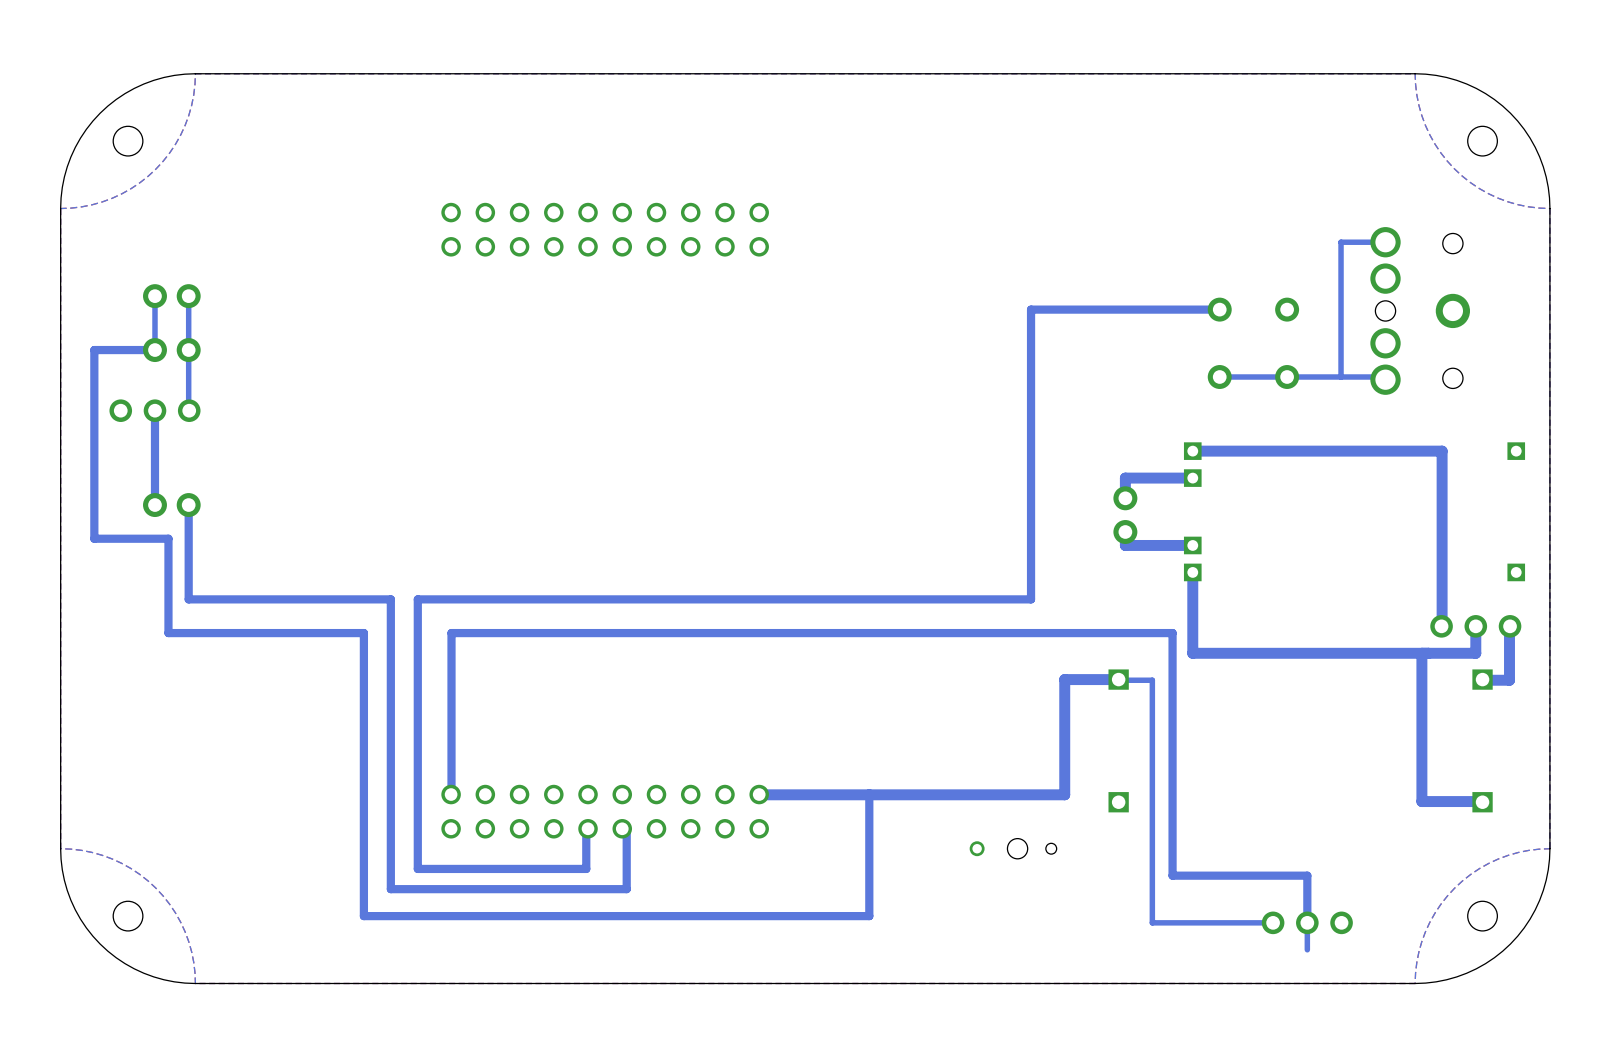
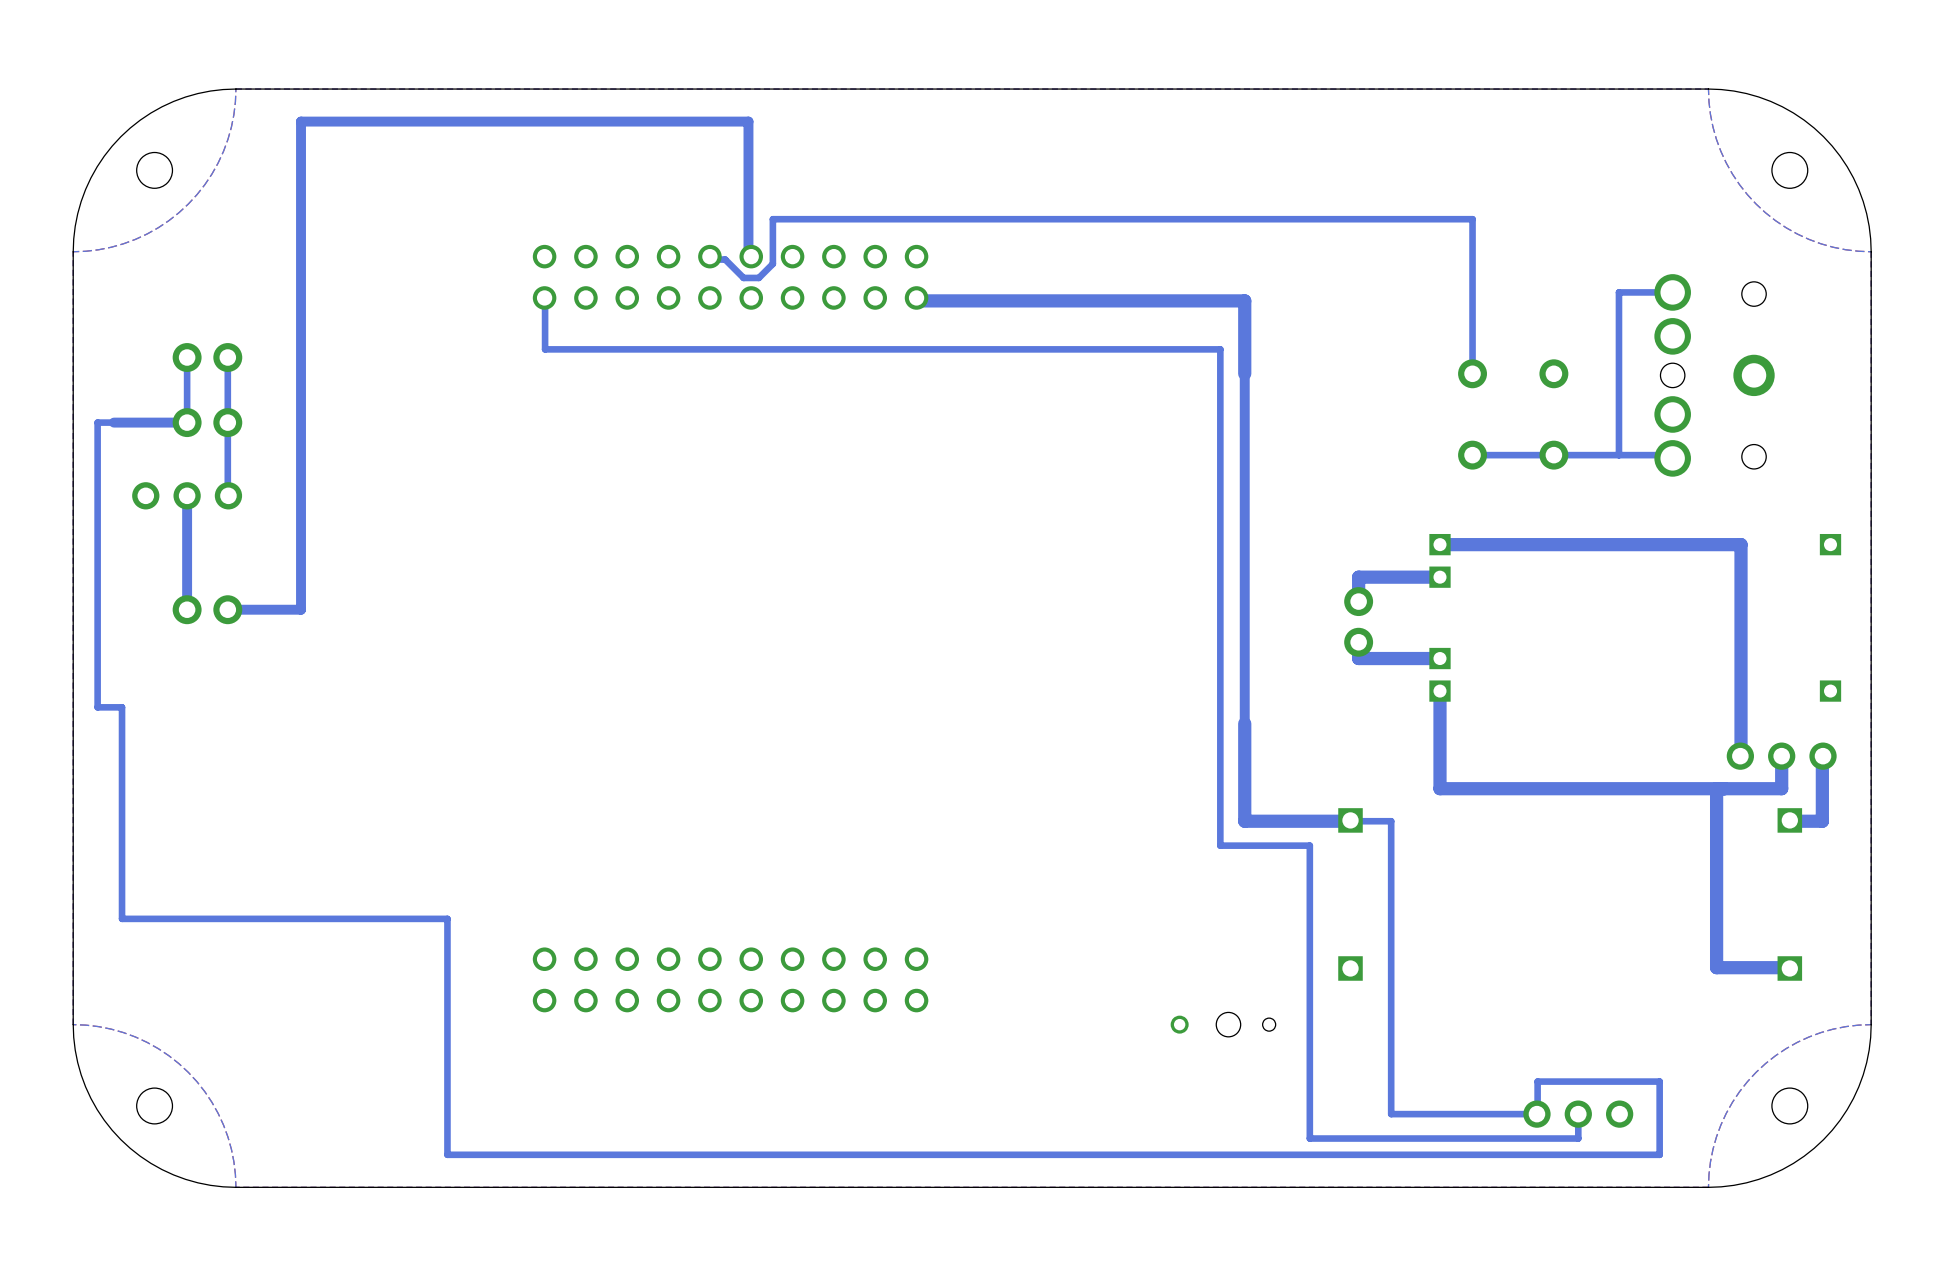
bottom track: none -> (916, 300) (1244, 300) (1244, 373)
bottom track: (1219, 309) (1031, 309) -> (1472, 373) (1472, 219) (772, 219) (772, 263) (758, 277) (743, 277) (725, 259) (709, 259)
bottom track: (94, 350) (94, 538) (168, 538) (168, 633) (363, 633) (363, 916) (869, 916) (869, 794) -> (113, 422) (97, 422) (97, 707) (122, 707) (122, 918) (447, 918) (447, 1154) (1659, 1154) (1659, 1081) (1537, 1081) (1536, 1114)
bottom track: (188, 505) (188, 599) (390, 599) (390, 889) (626, 889) (626, 828) (622, 828) -> (227, 609) (301, 609) (301, 121) (748, 121) (748, 259) (751, 259)
bottom track: (1031, 599) (417, 599) (417, 868) (586, 868) (586, 828) (588, 828) -> none
bottom track: (1118, 679) (1064, 679) (1064, 794) (759, 794) -> (1350, 820) (1244, 821) (1244, 723)
bottom track: (451, 794) (451, 633) (1172, 633) (1172, 875) (1307, 875) (1307, 922) -> none
bottom track: (1307, 943) (1307, 949) -> (1578, 1138) (1309, 1138) (1309, 845) (1220, 845) (1220, 349) (545, 349) (544, 300)

